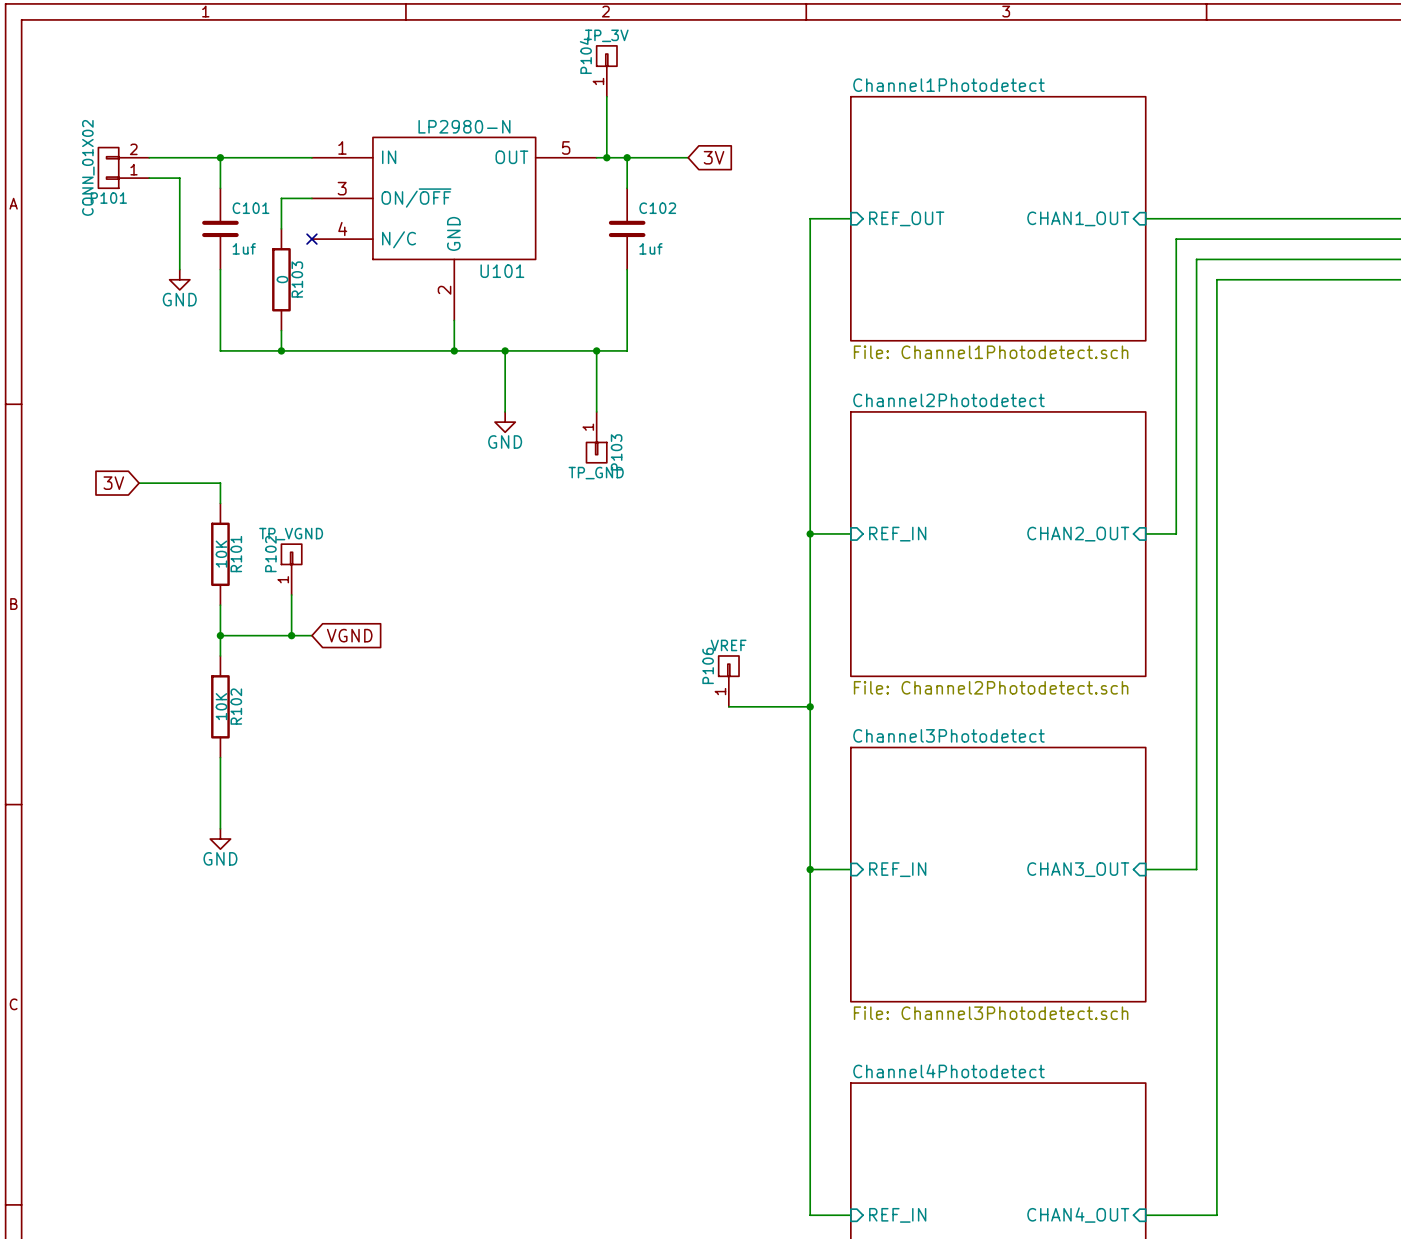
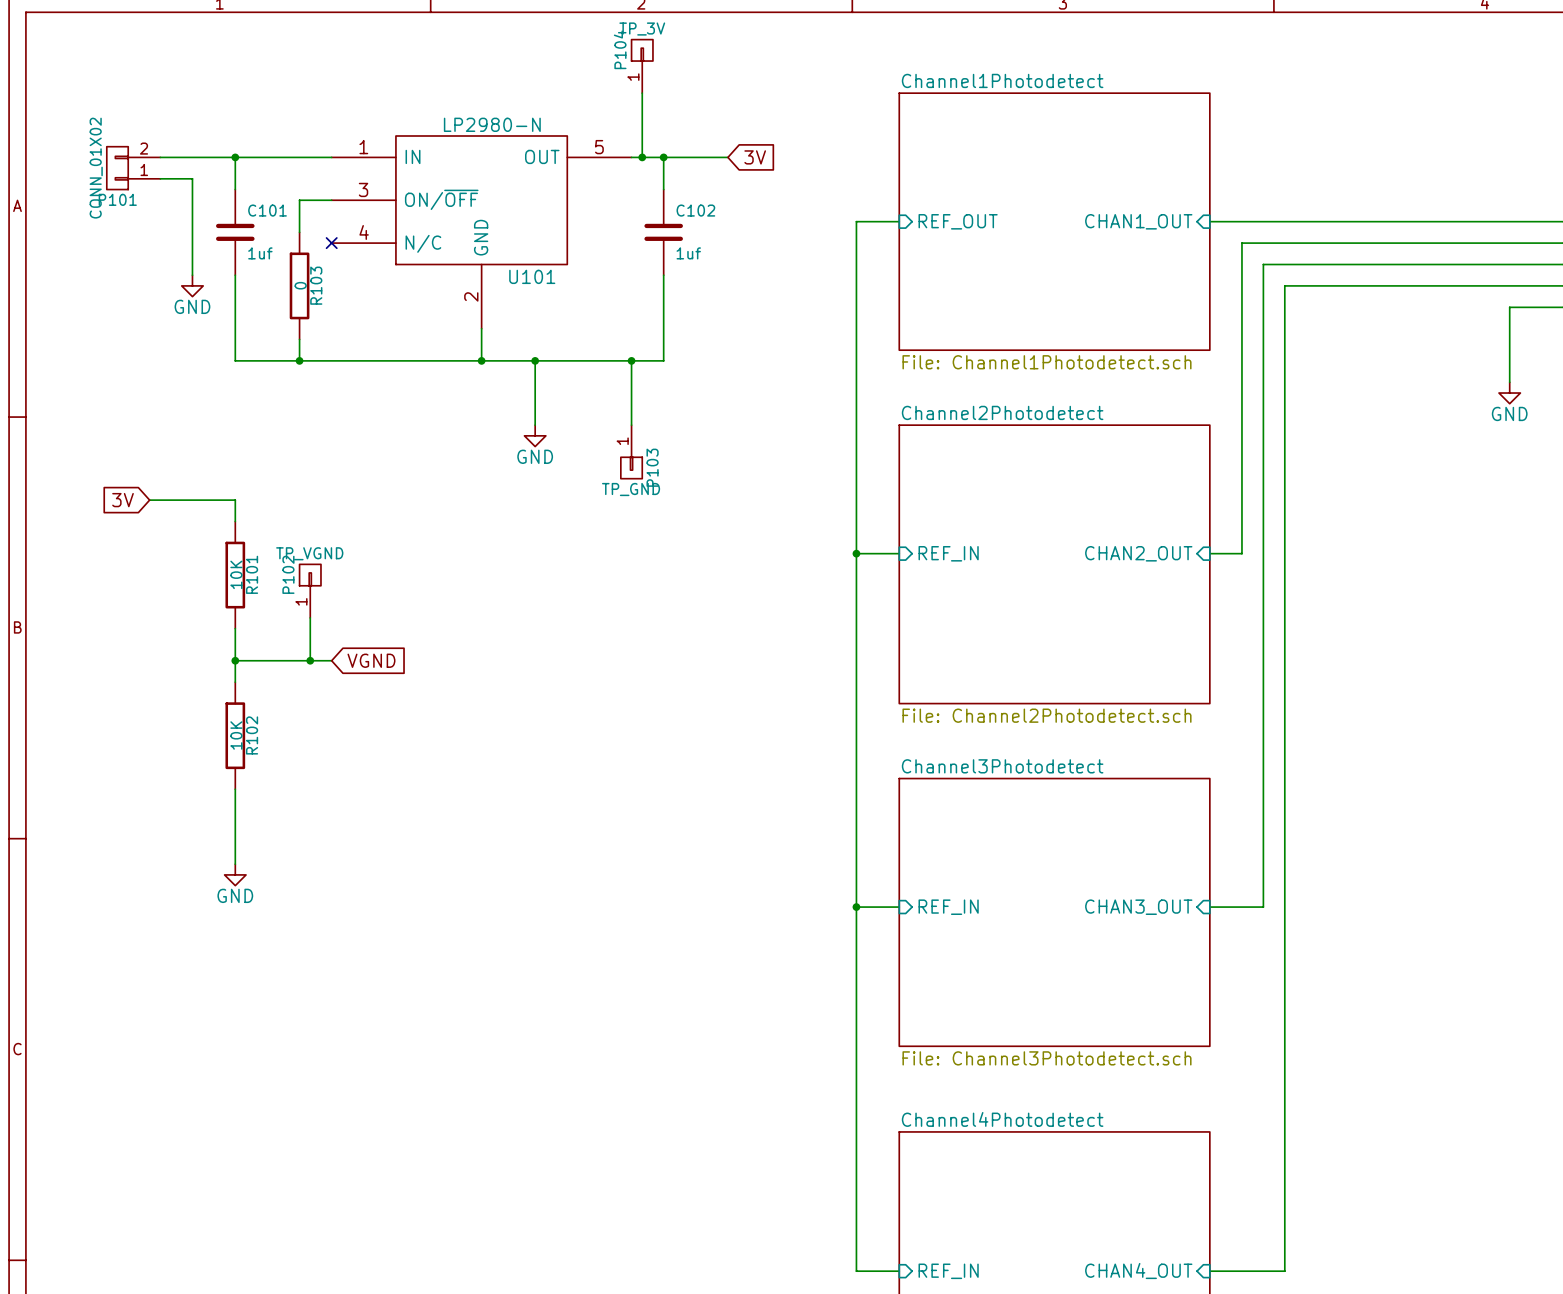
P106: VREF (728, 681) -> none
wire: (728, 706) (810, 706) -> none
junction: (810, 706) -> none

